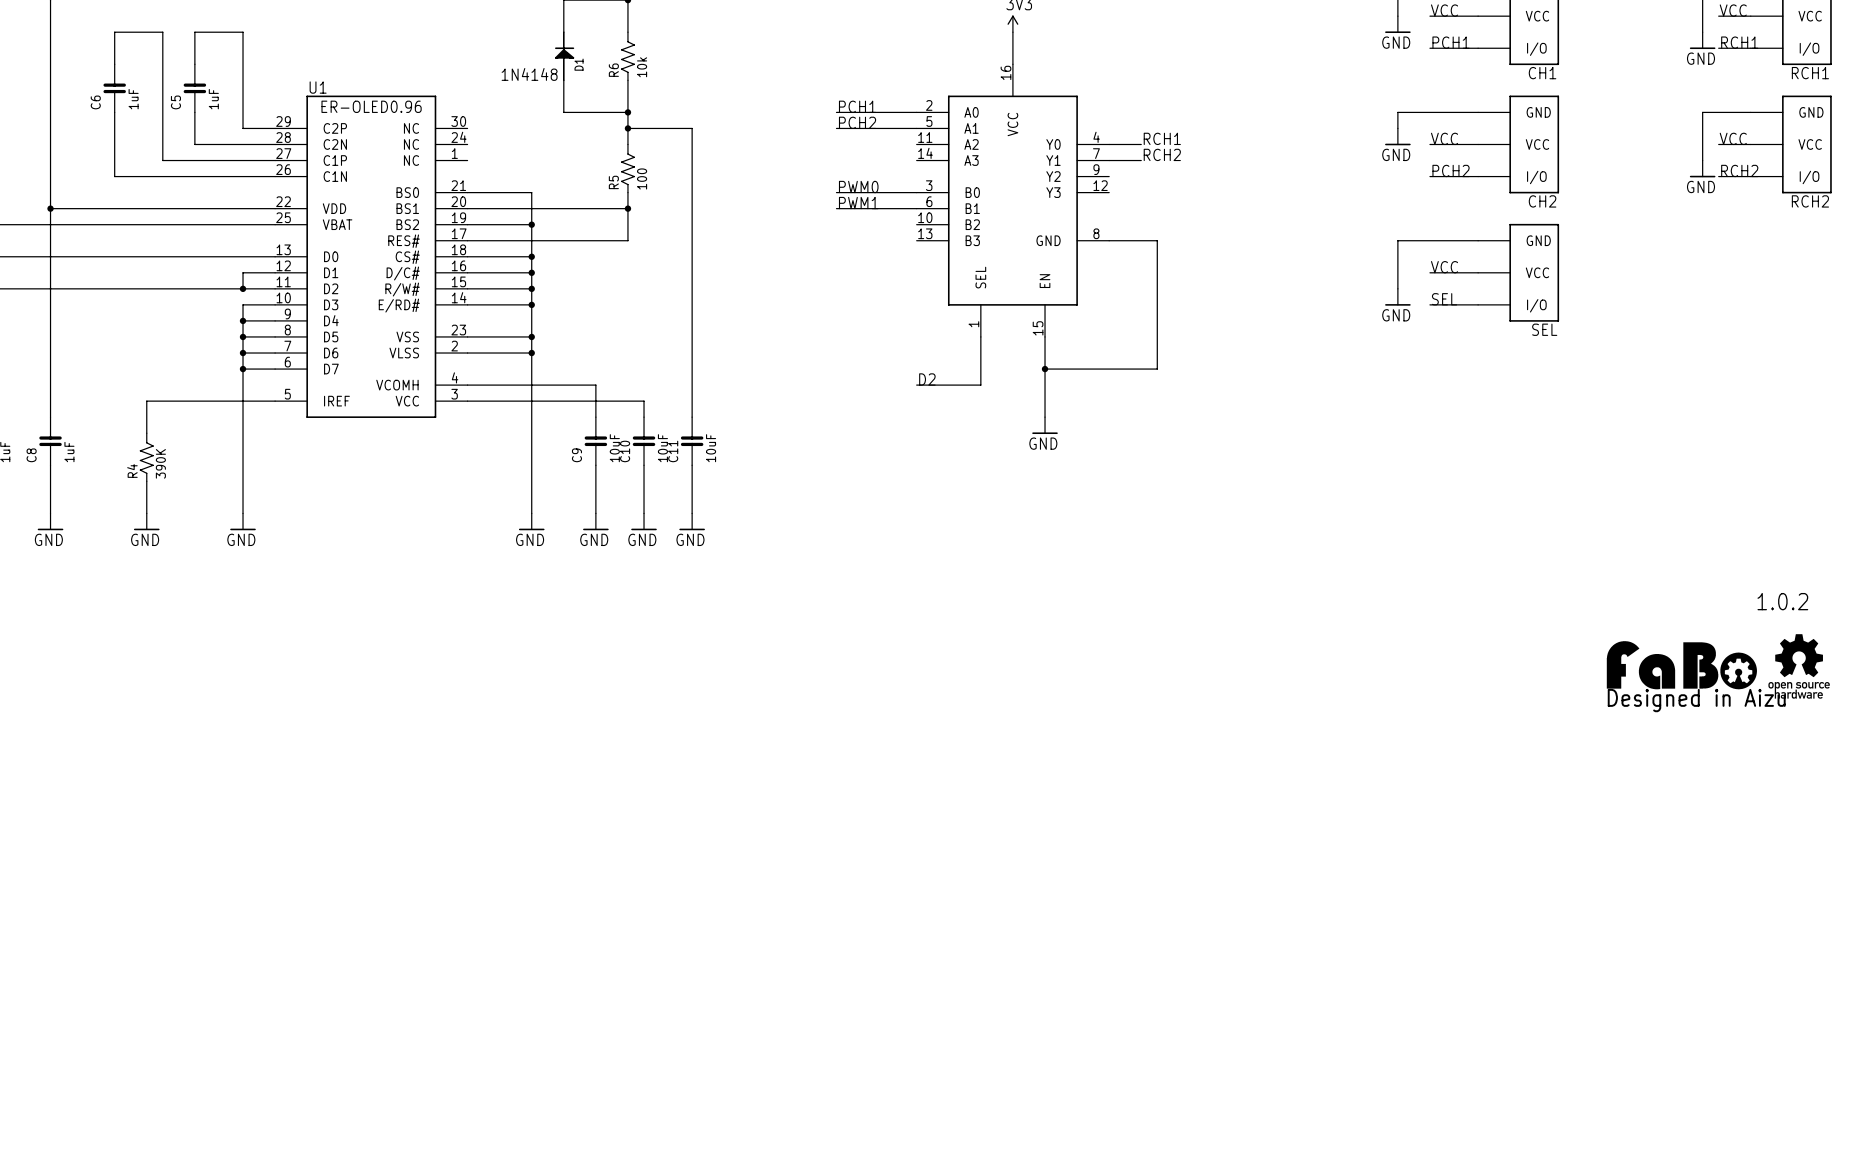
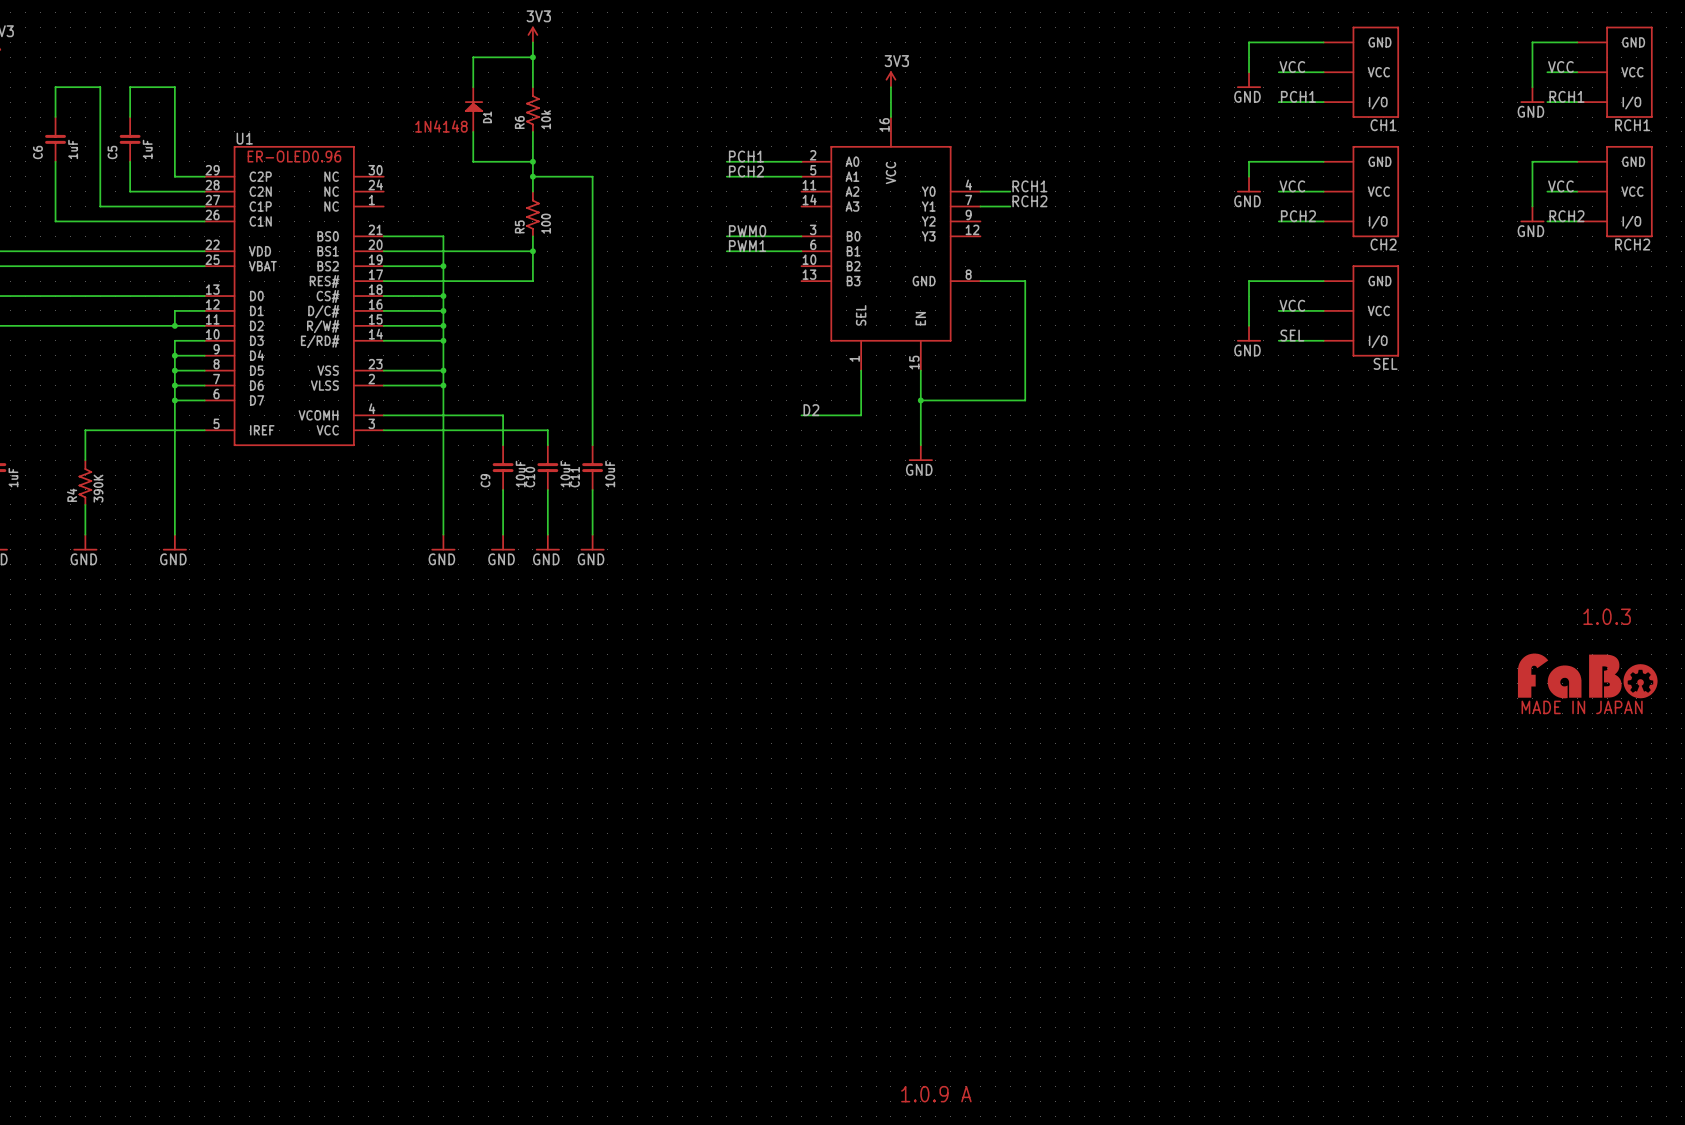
text: 1.0.2 (1782, 601) -> 1.0.3 (1607, 616)
part: (1681, 665) -> none
part: none -> (1587, 675)
part: (1799, 666) -> none
text: none -> 1.0.9 A (936, 1094)

